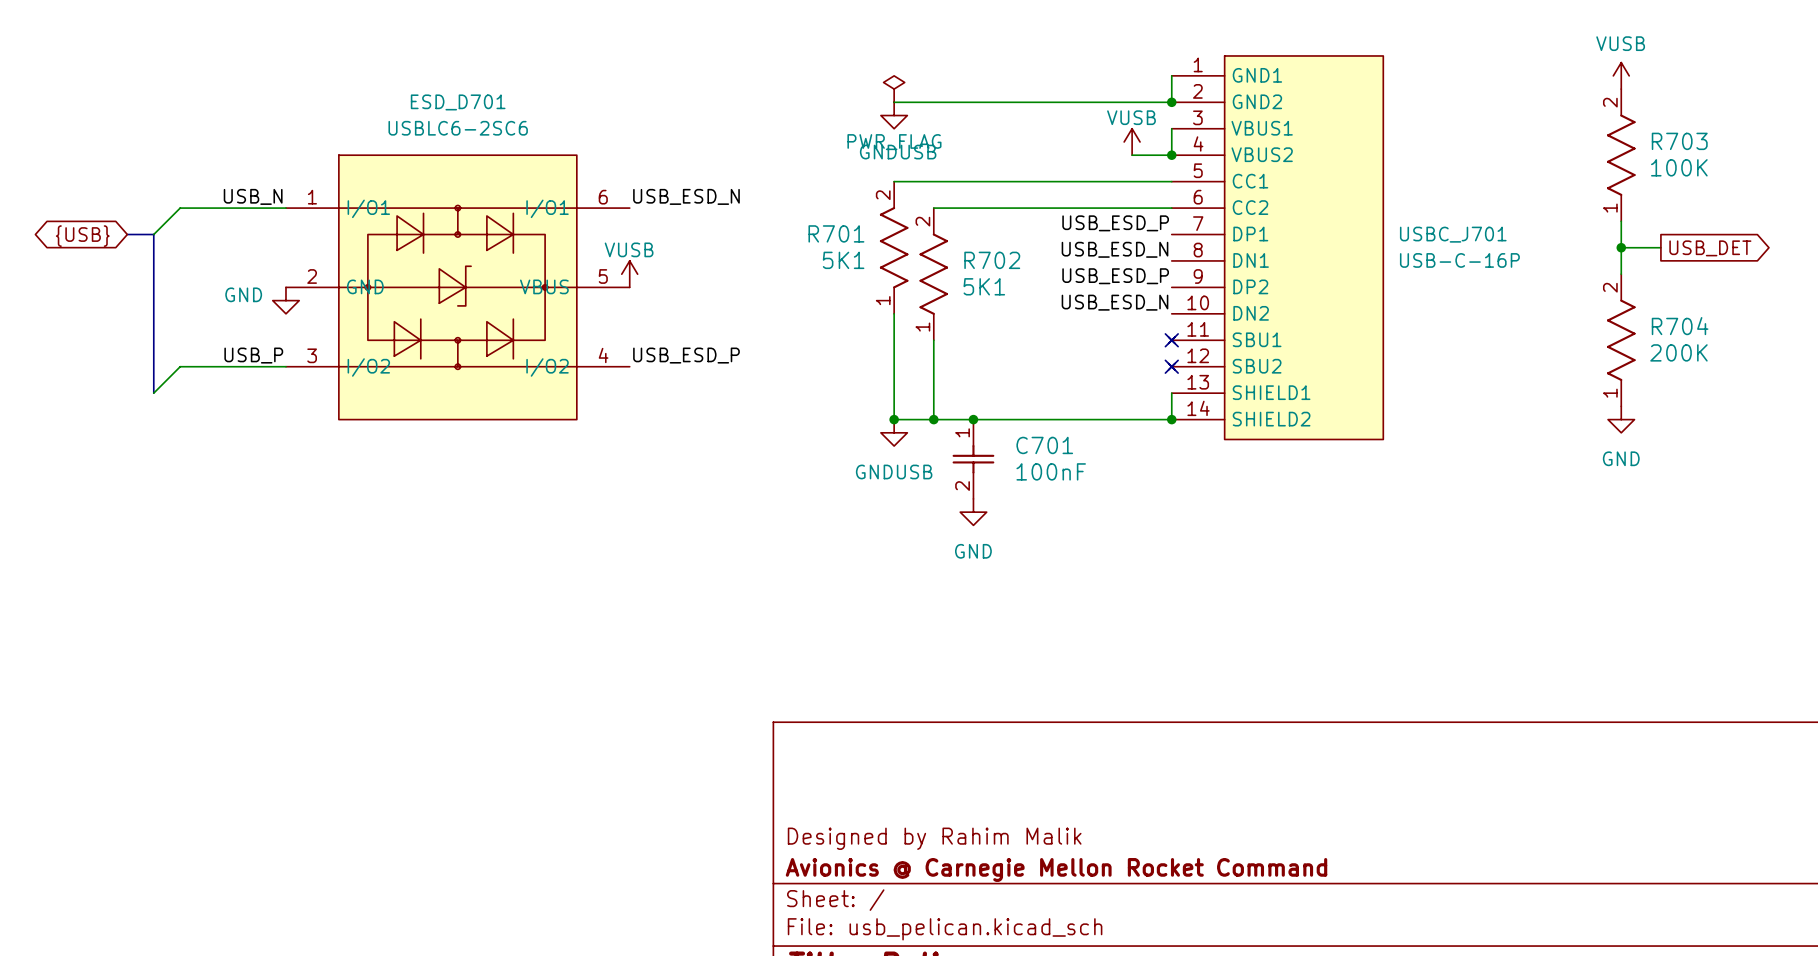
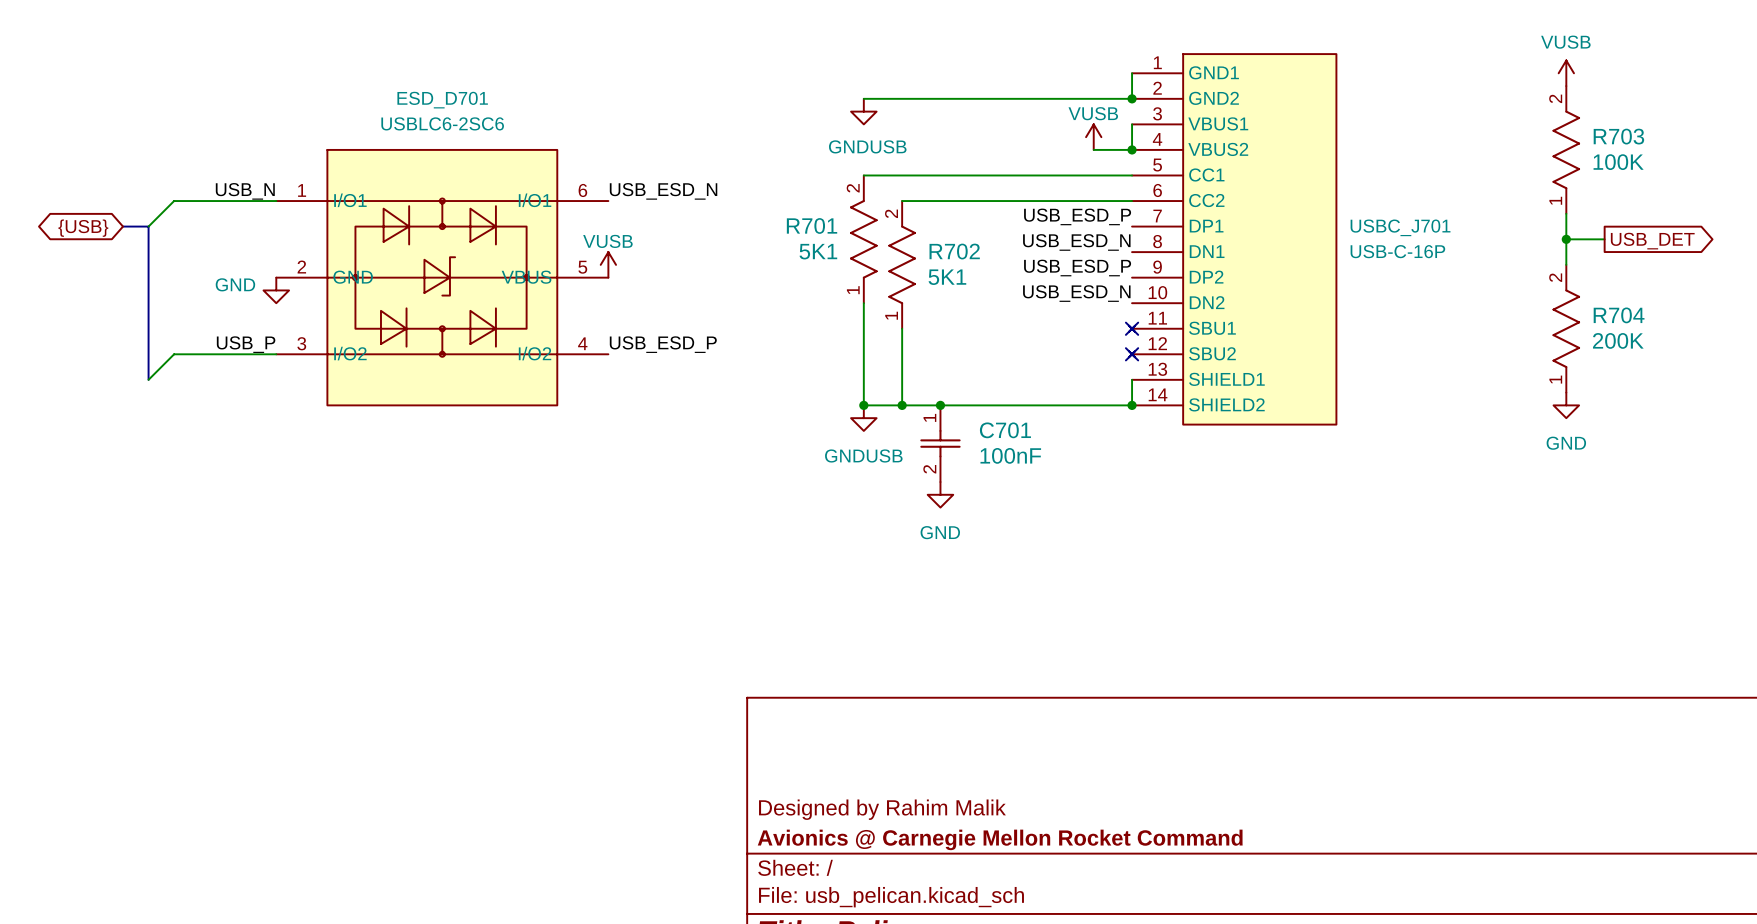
power symbol: PWR_FLAG (894, 89) -> none

